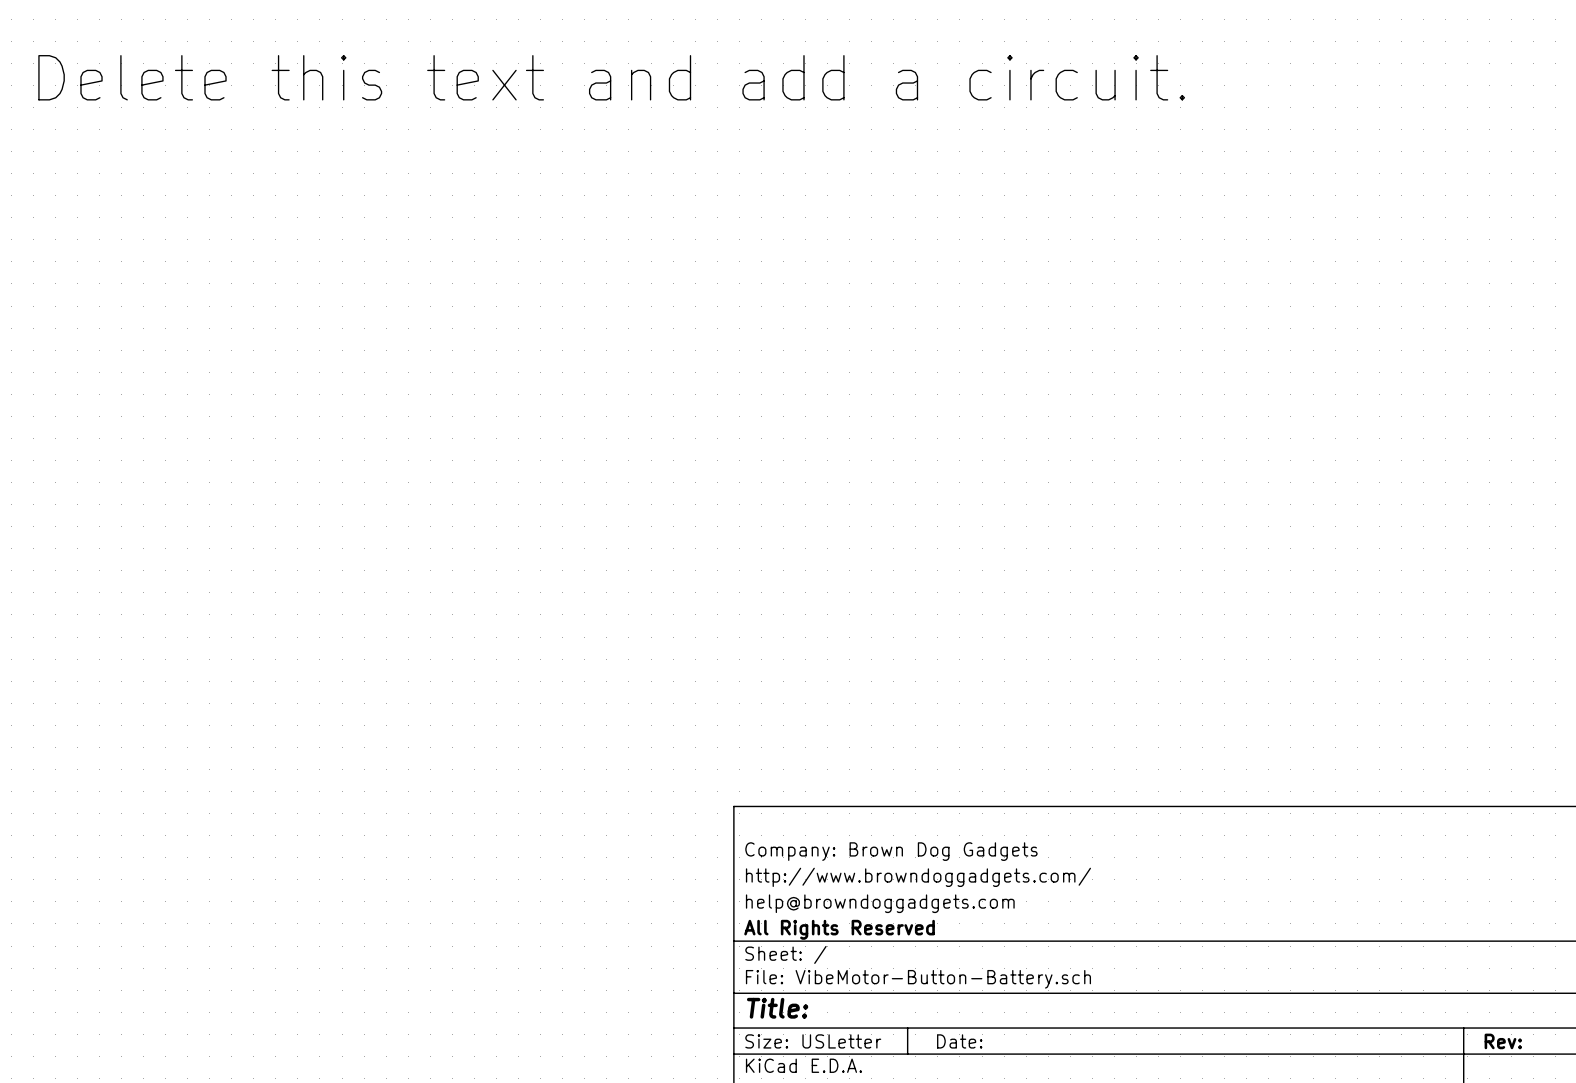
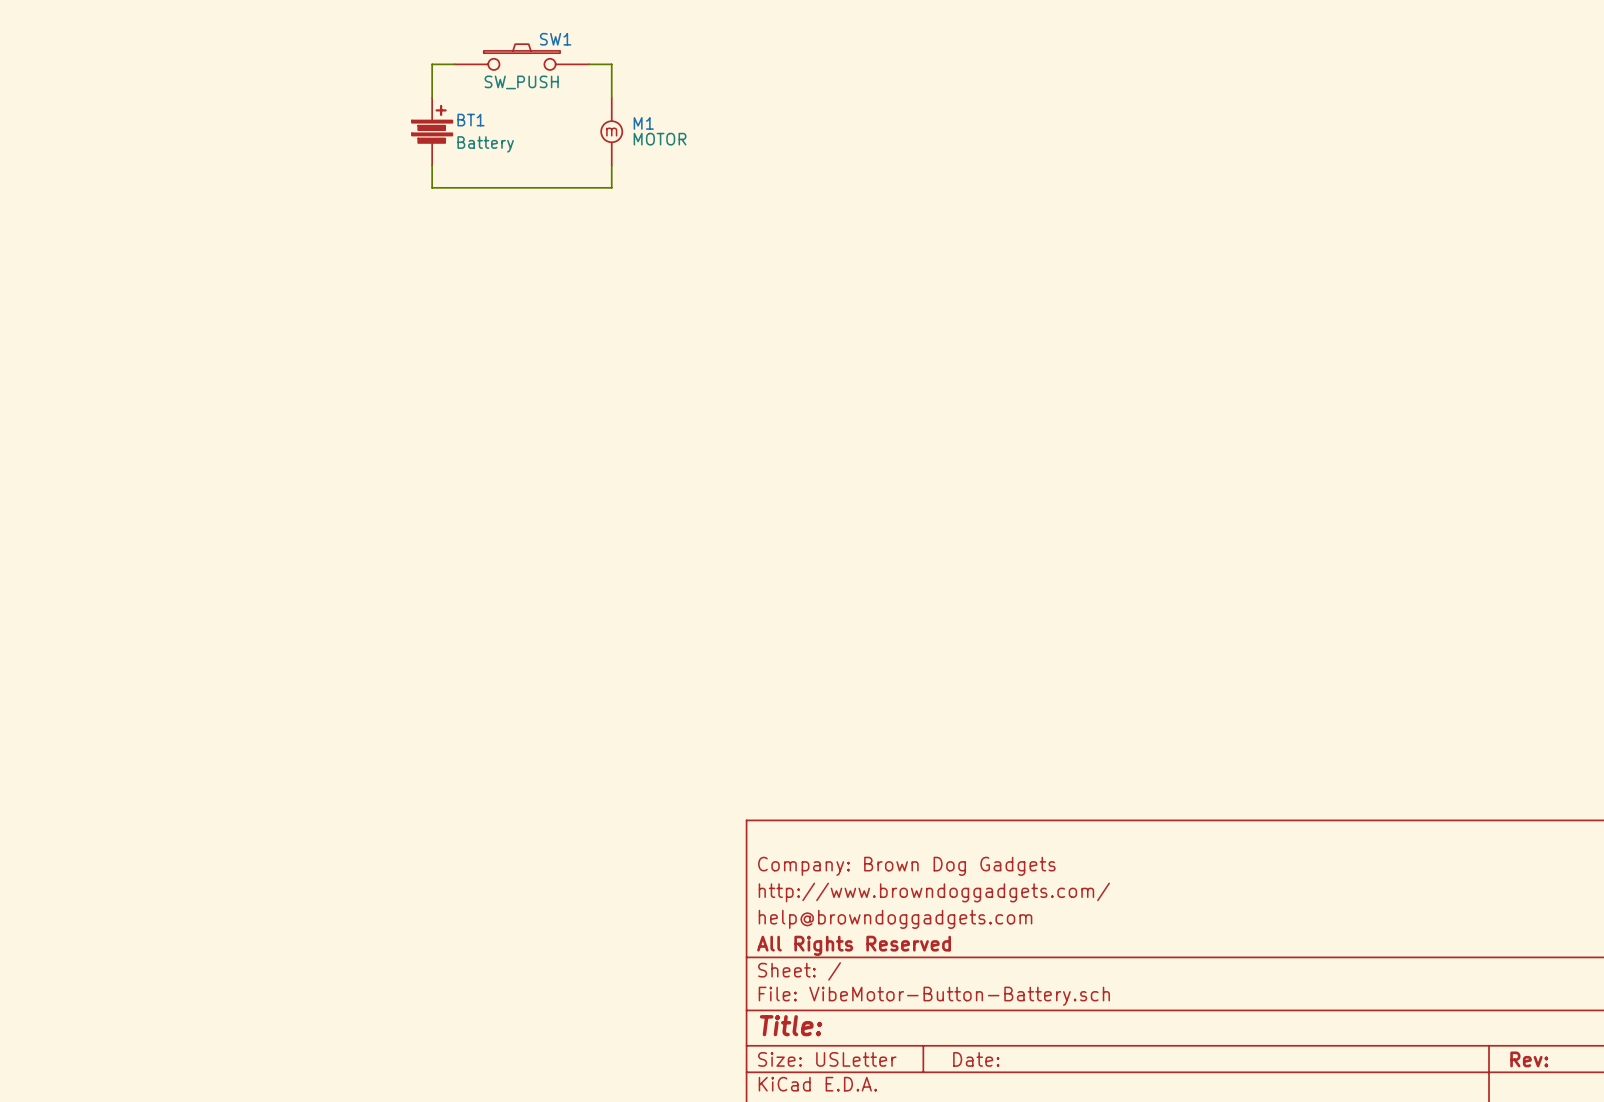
SW1: none -> SW_PUSH (521, 57)
wire: none -> (454, 64) (432, 64) (432, 98)
wire: none -> (589, 64) (611, 64) (611, 98)
text: Delete this text and add a circuit. (611, 77) -> none
BT1: none -> Battery (432, 131)
M1: none -> MOTOR (611, 131)
wire: none -> (432, 165) (432, 187) (611, 187) (611, 165)

